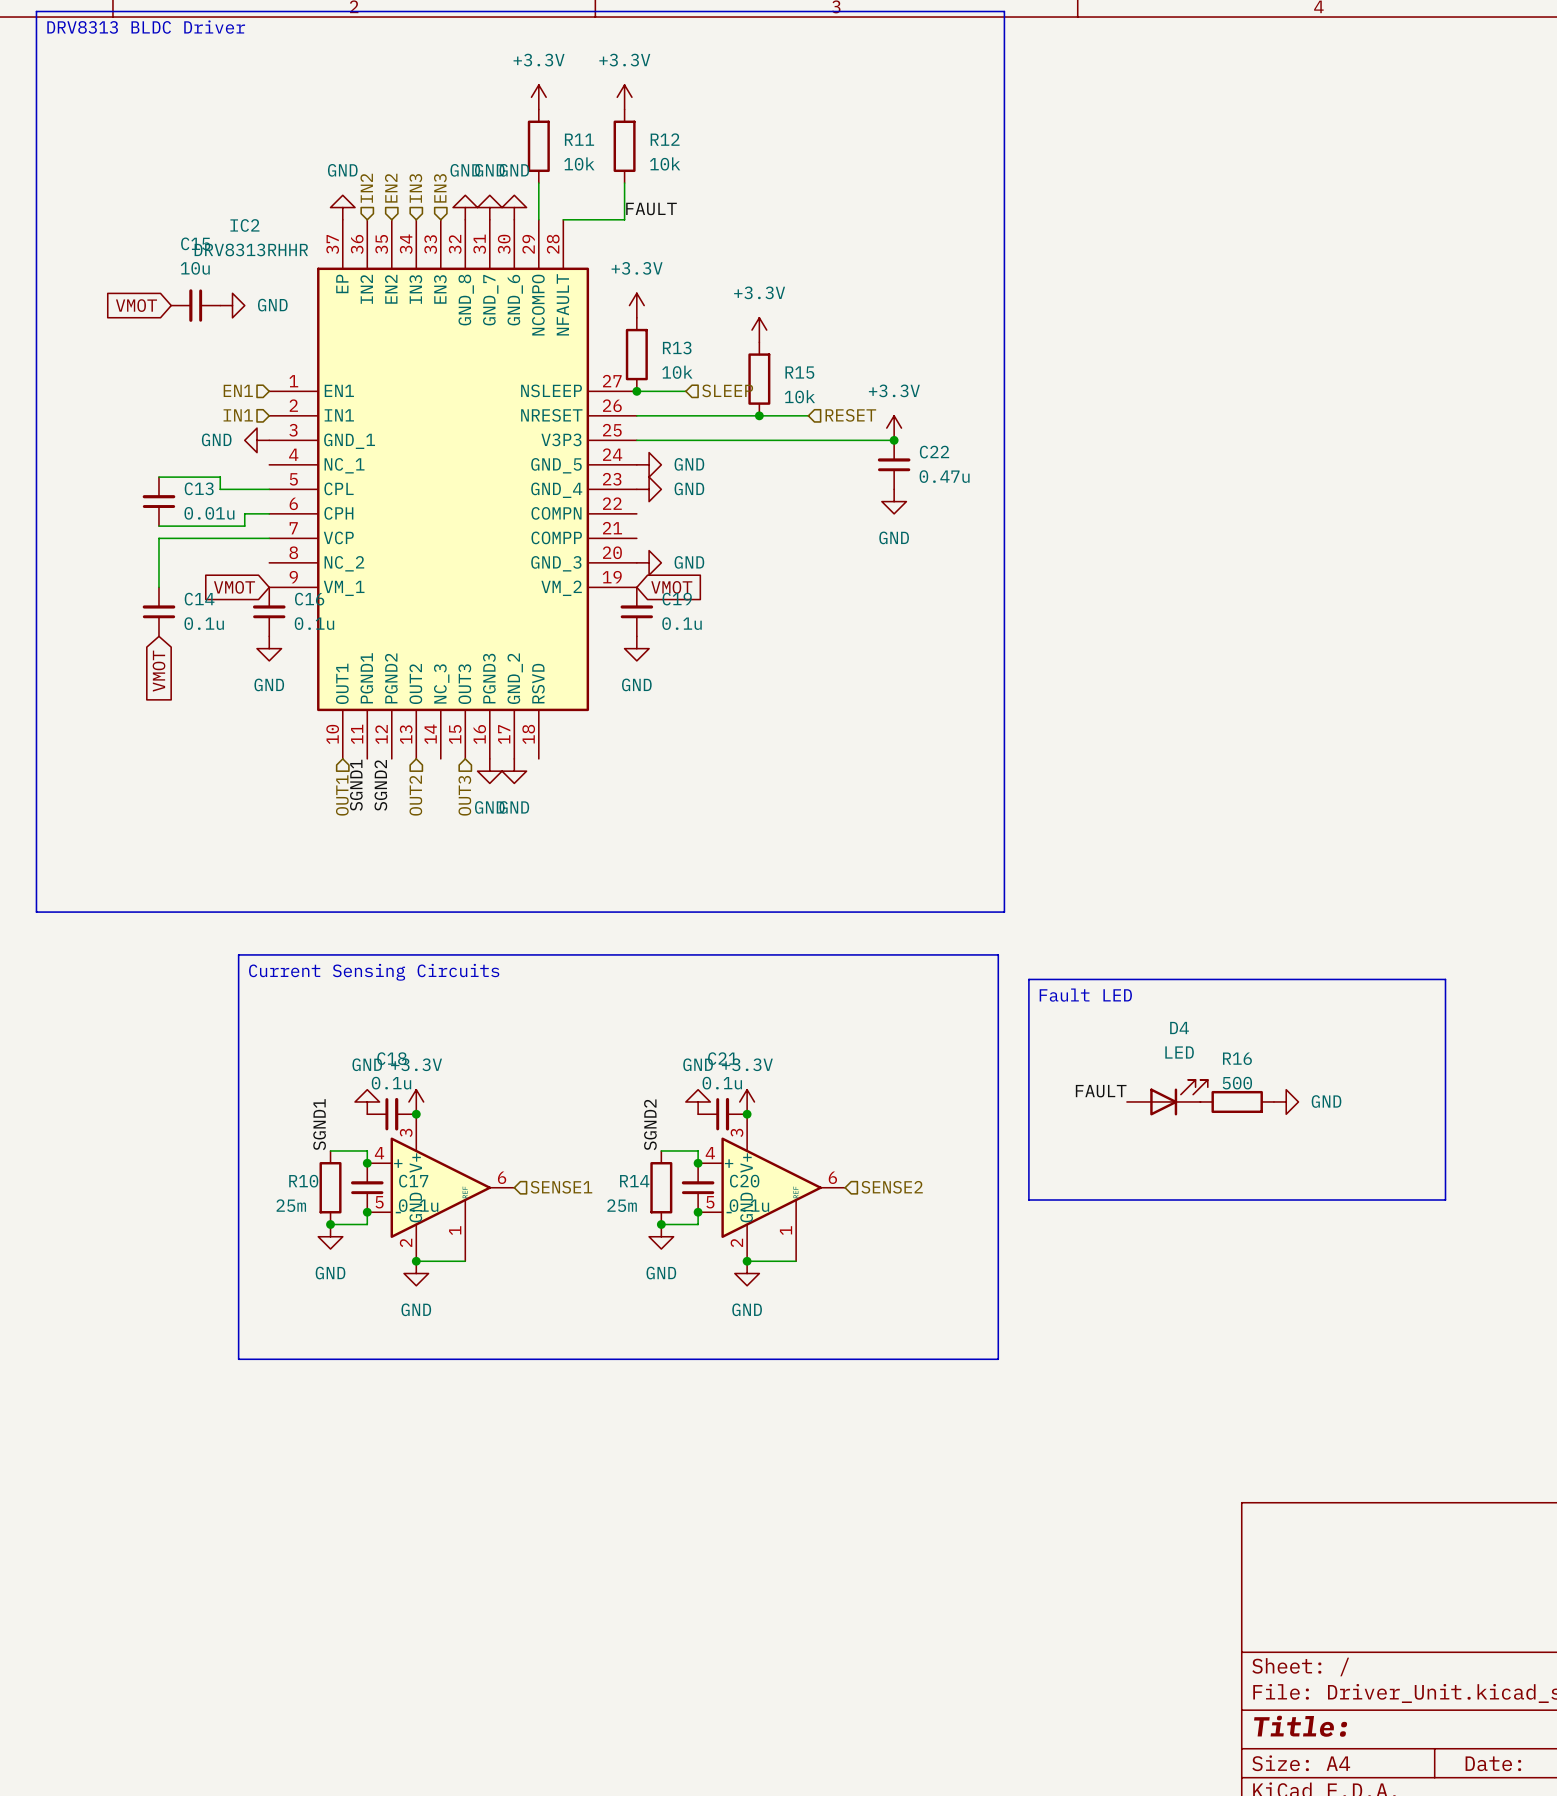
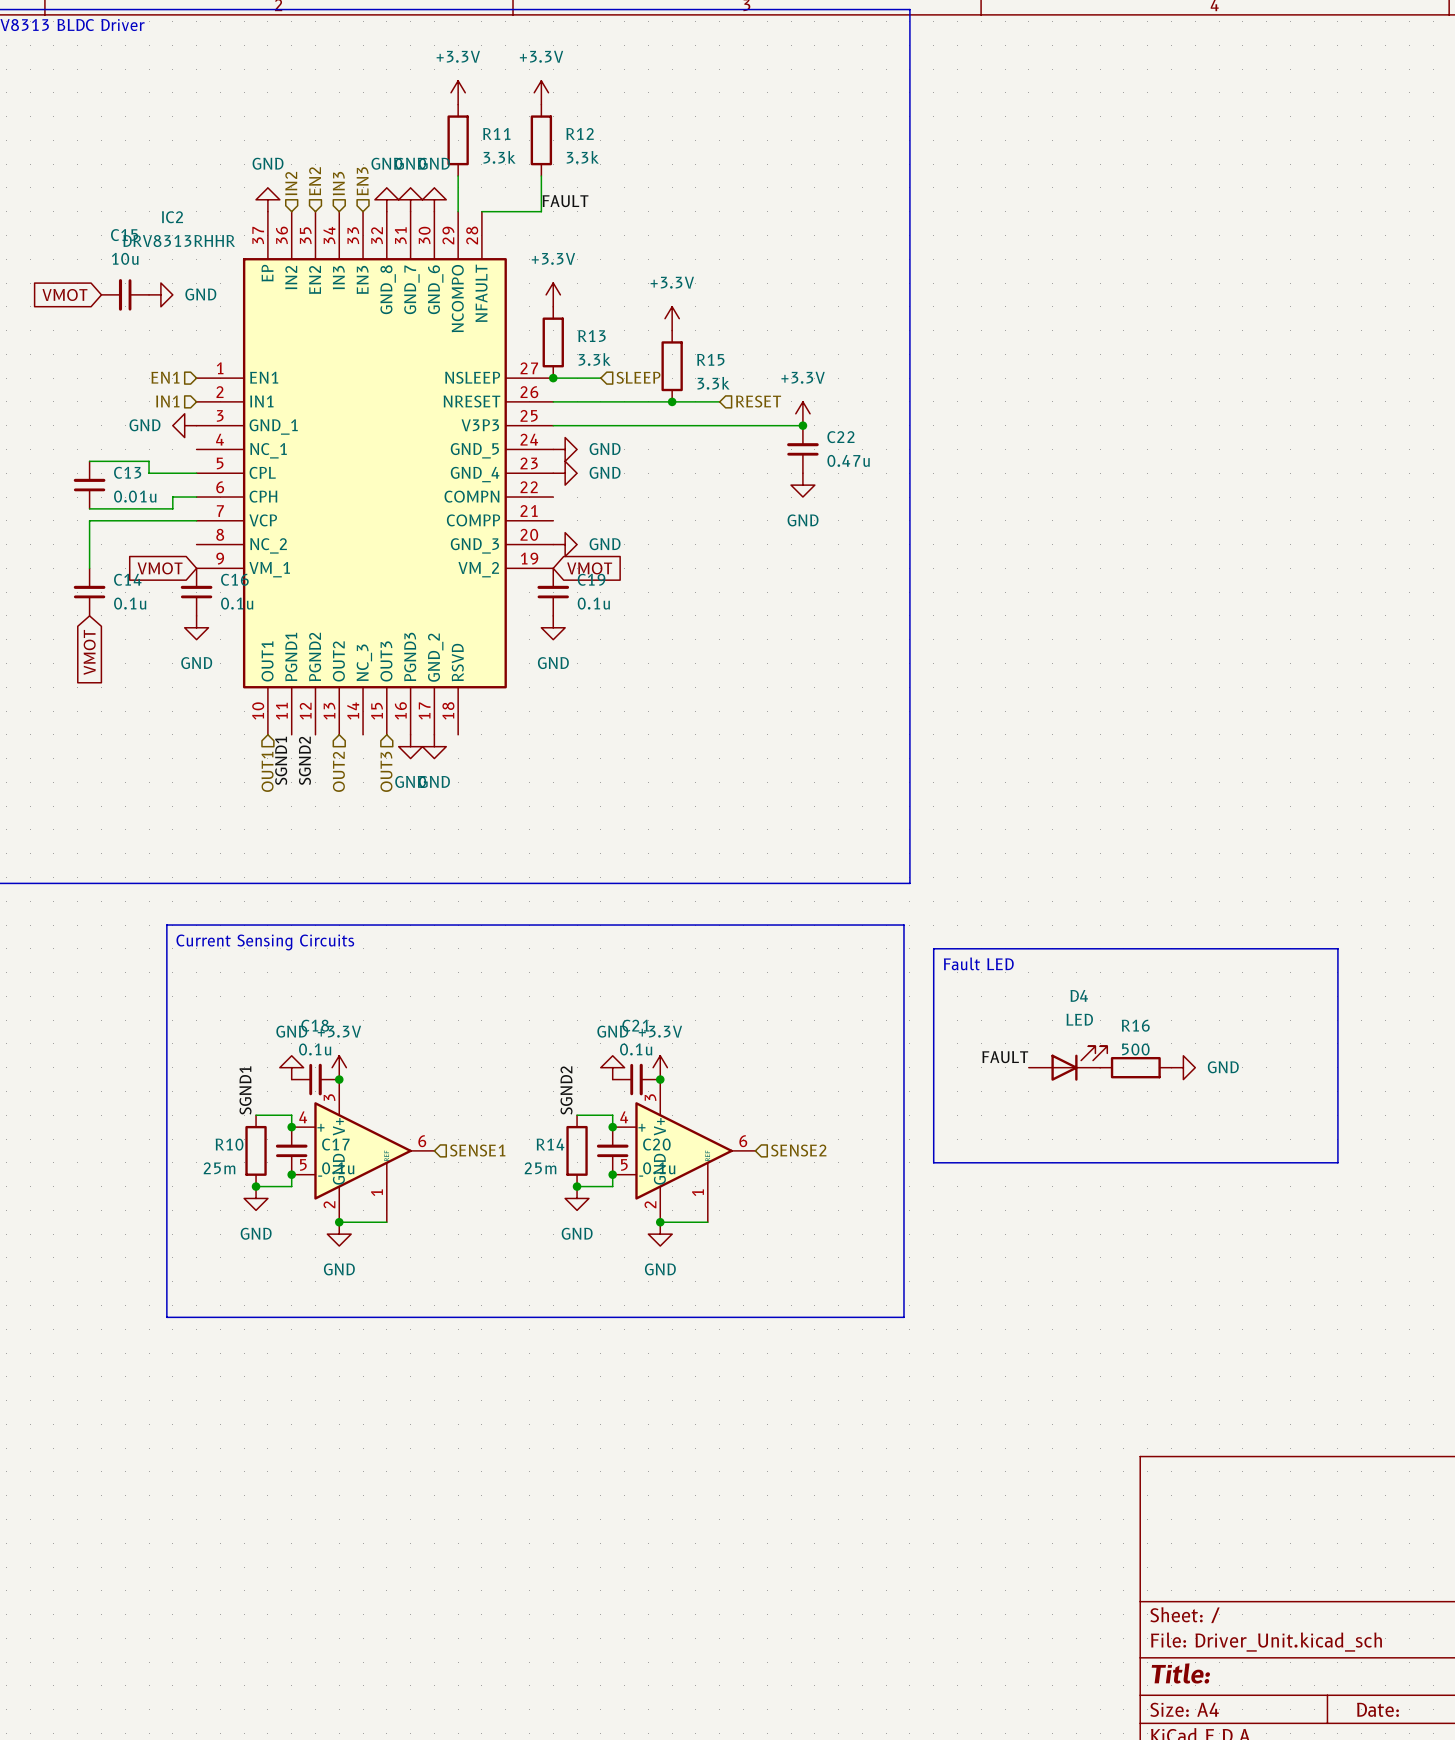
R11 value: 10k (579, 163) -> 3.3k (499, 157)
R12 value: 10k (665, 163) -> 3.3k (582, 157)
R13 value: 10k (677, 372) -> 3.3k (594, 359)
R15 value: 10k (799, 396) -> 3.3k (713, 383)

